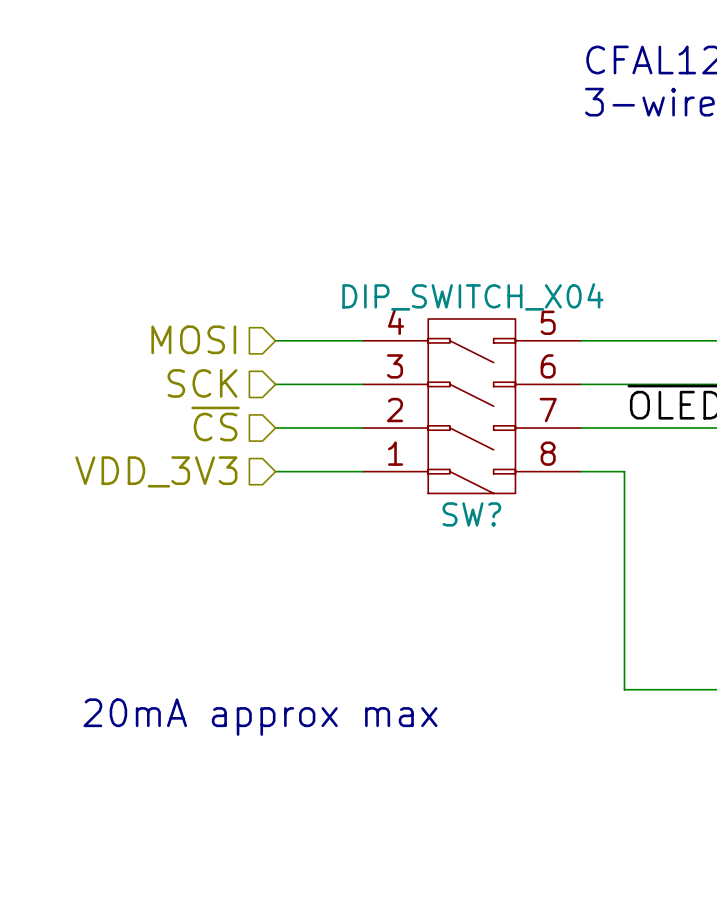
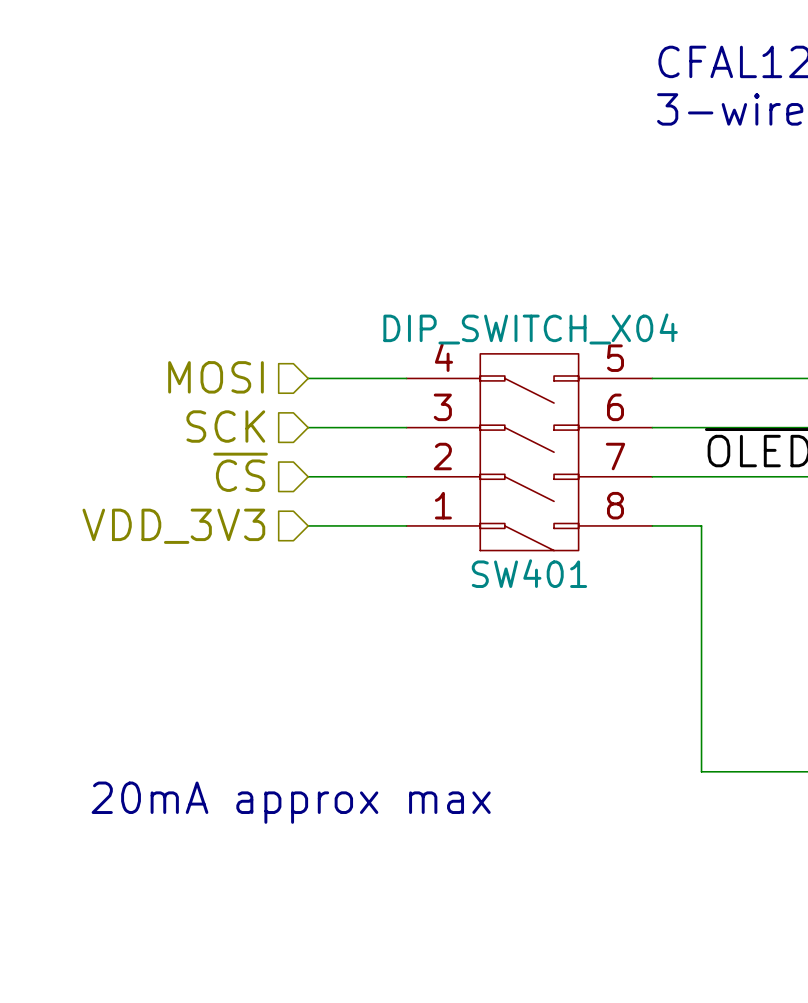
SW? name: SW? (471, 514) -> SW401 (529, 573)

